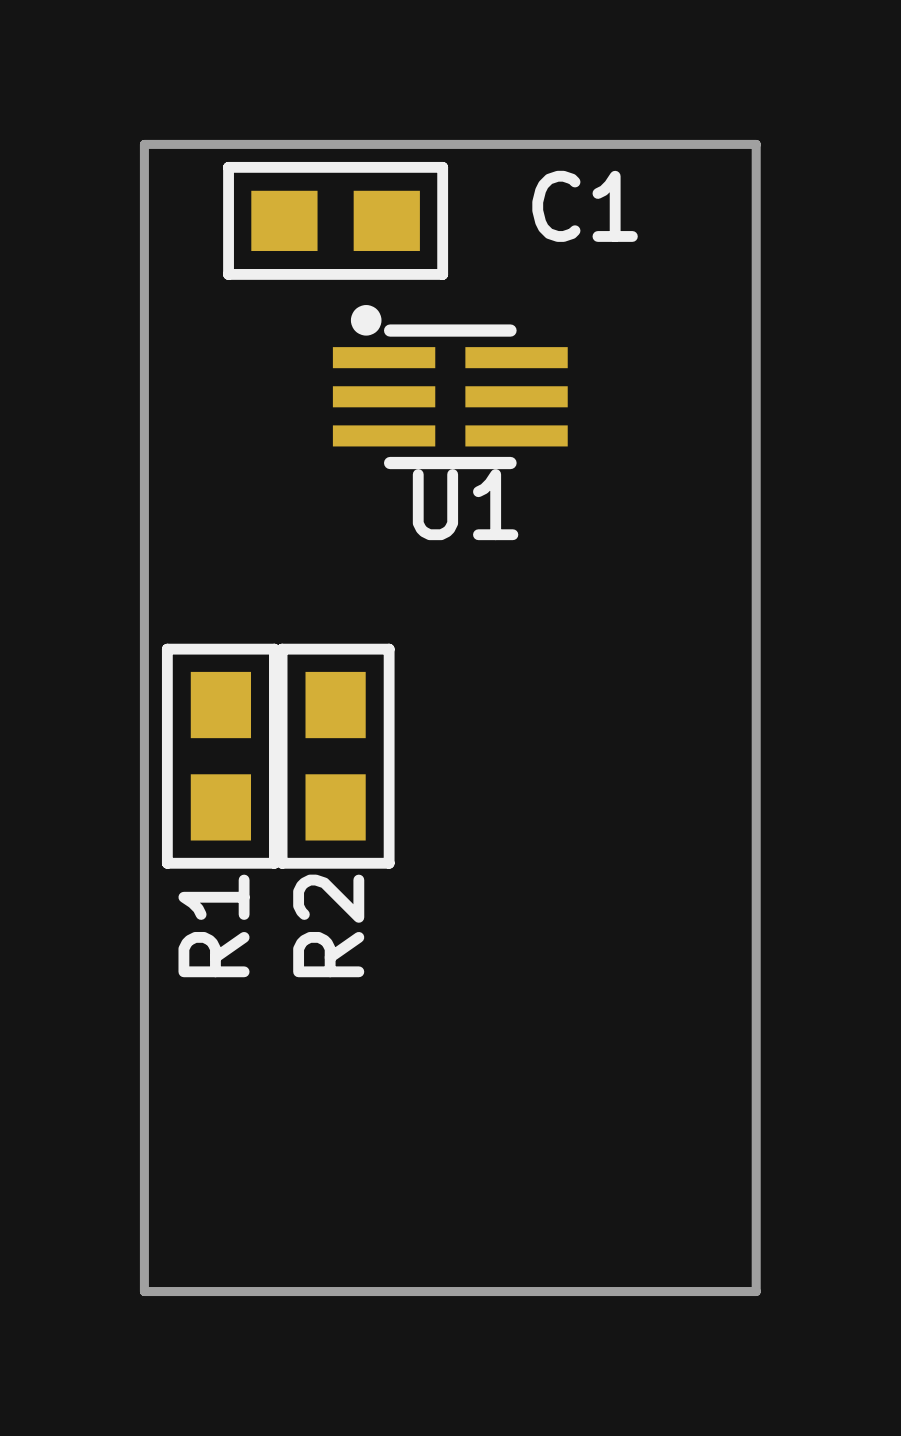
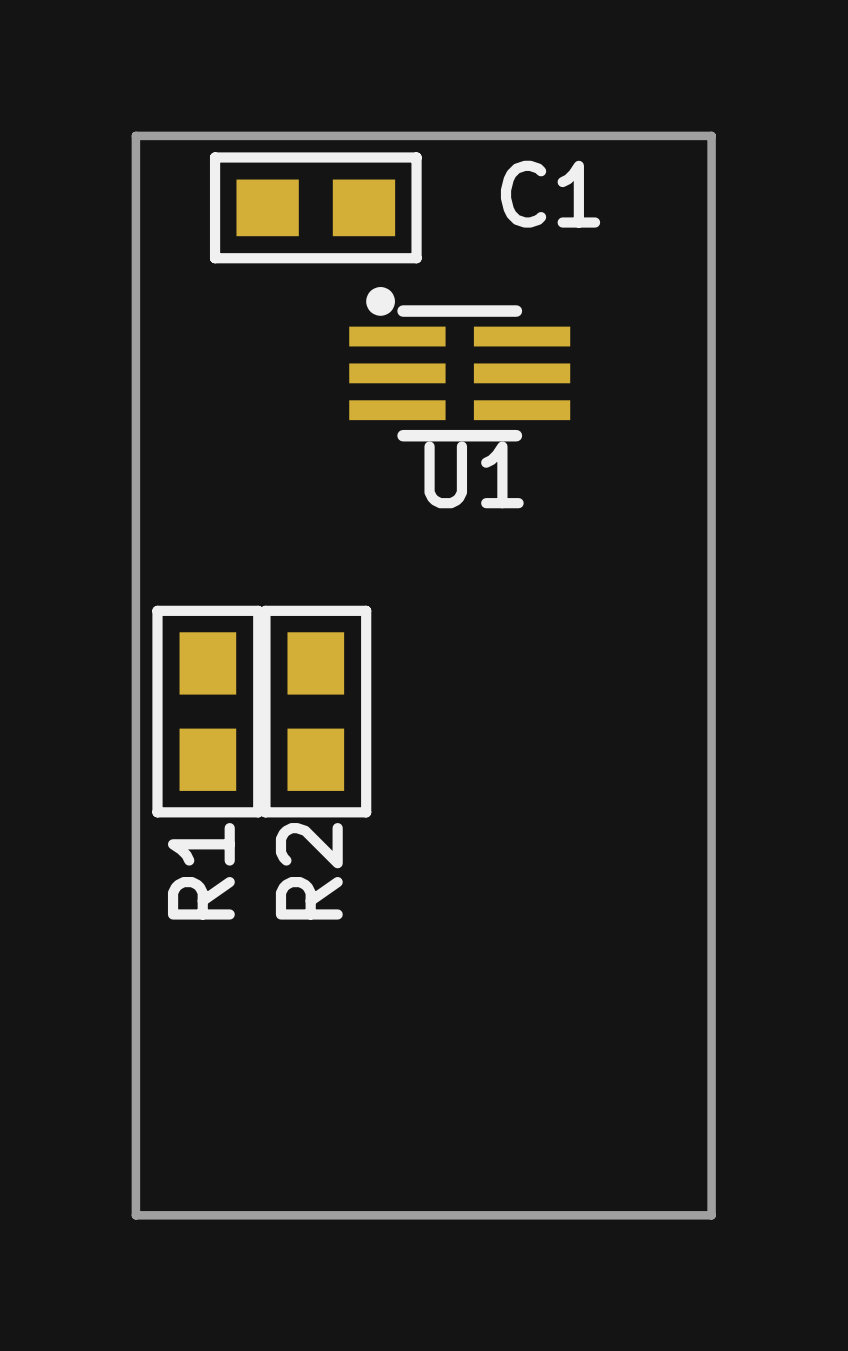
U1 position: (450, 387) -> (459, 364)

